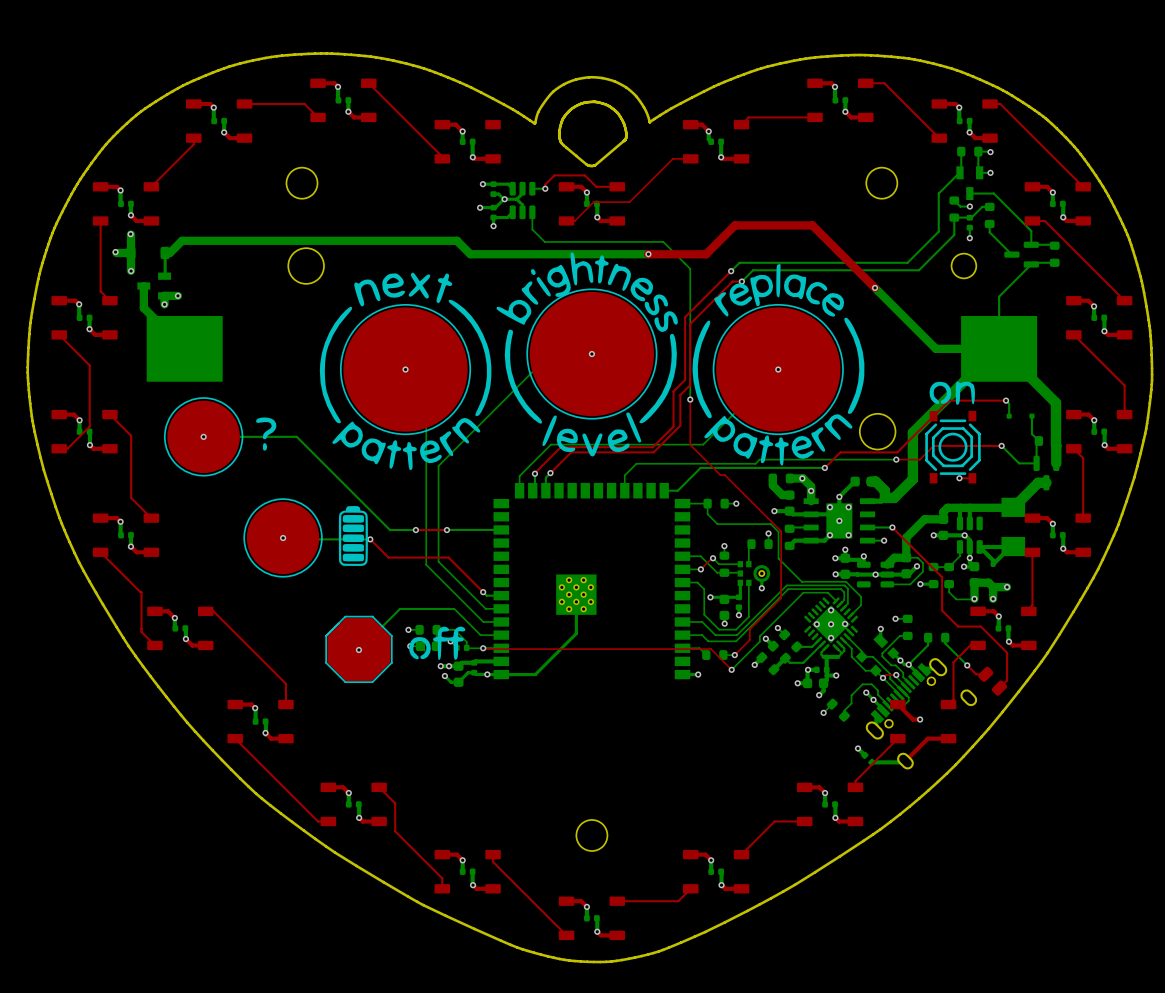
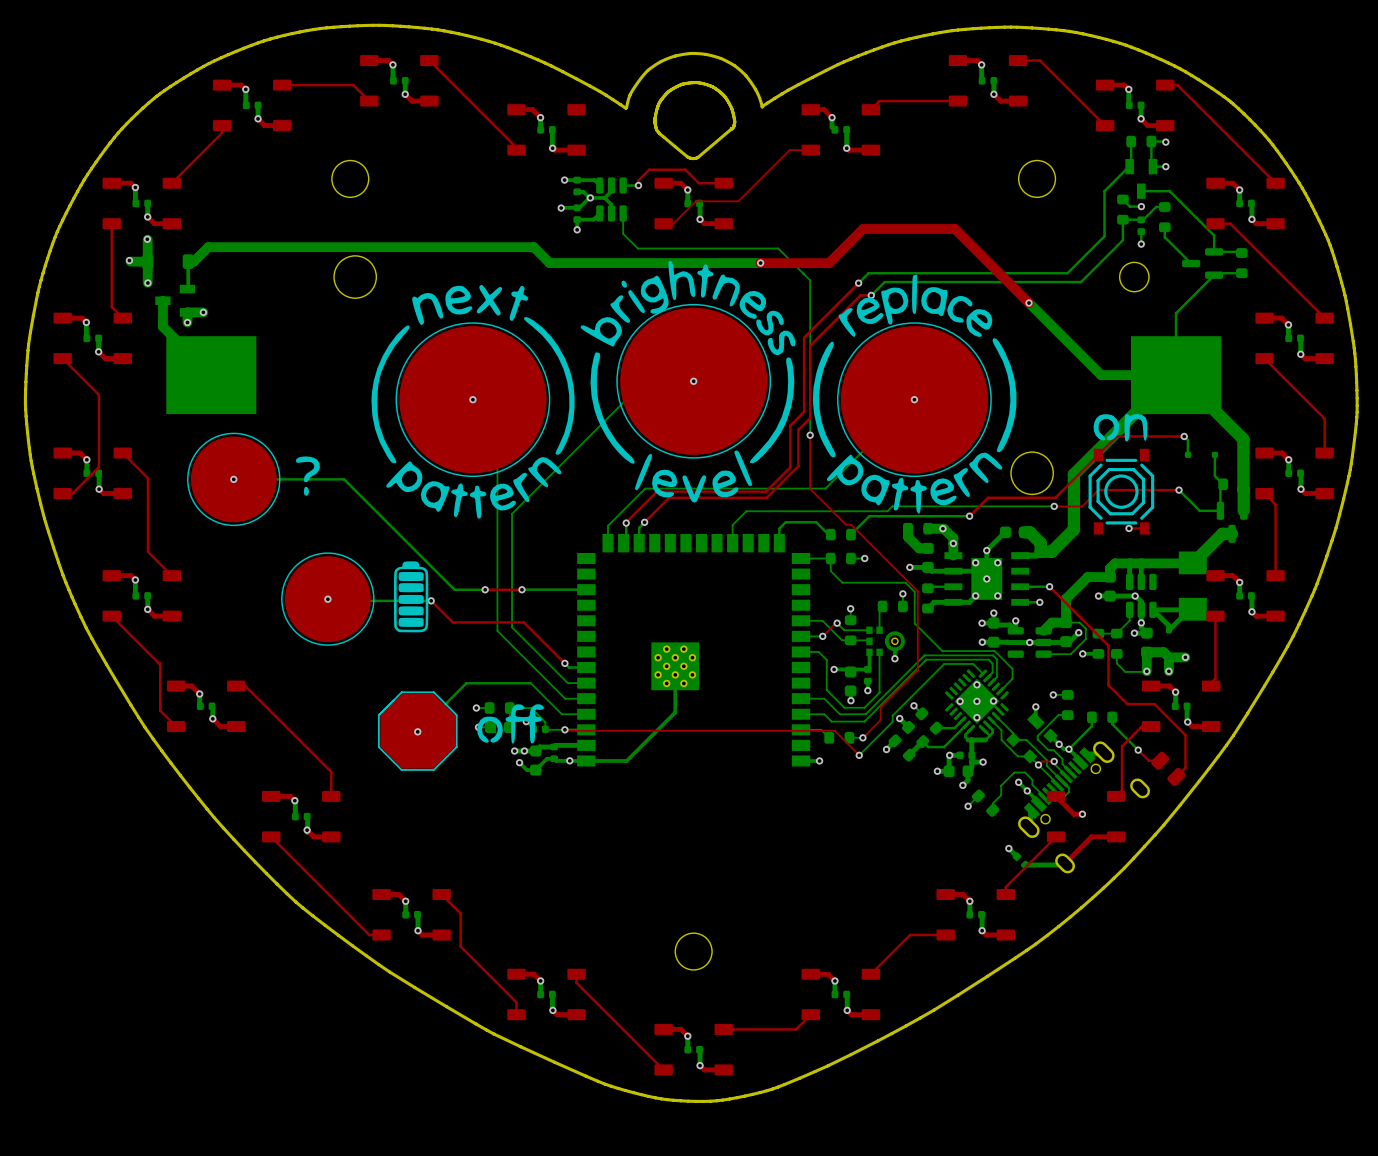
bottom track: (740, 467) (700, 467) (677, 490) (664, 490) -> (830, 534) (816, 522) (785, 522) (779, 528) (779, 543)
bottom track: none -> (869, 516) (850, 534)
part: none -> (840, 534)

